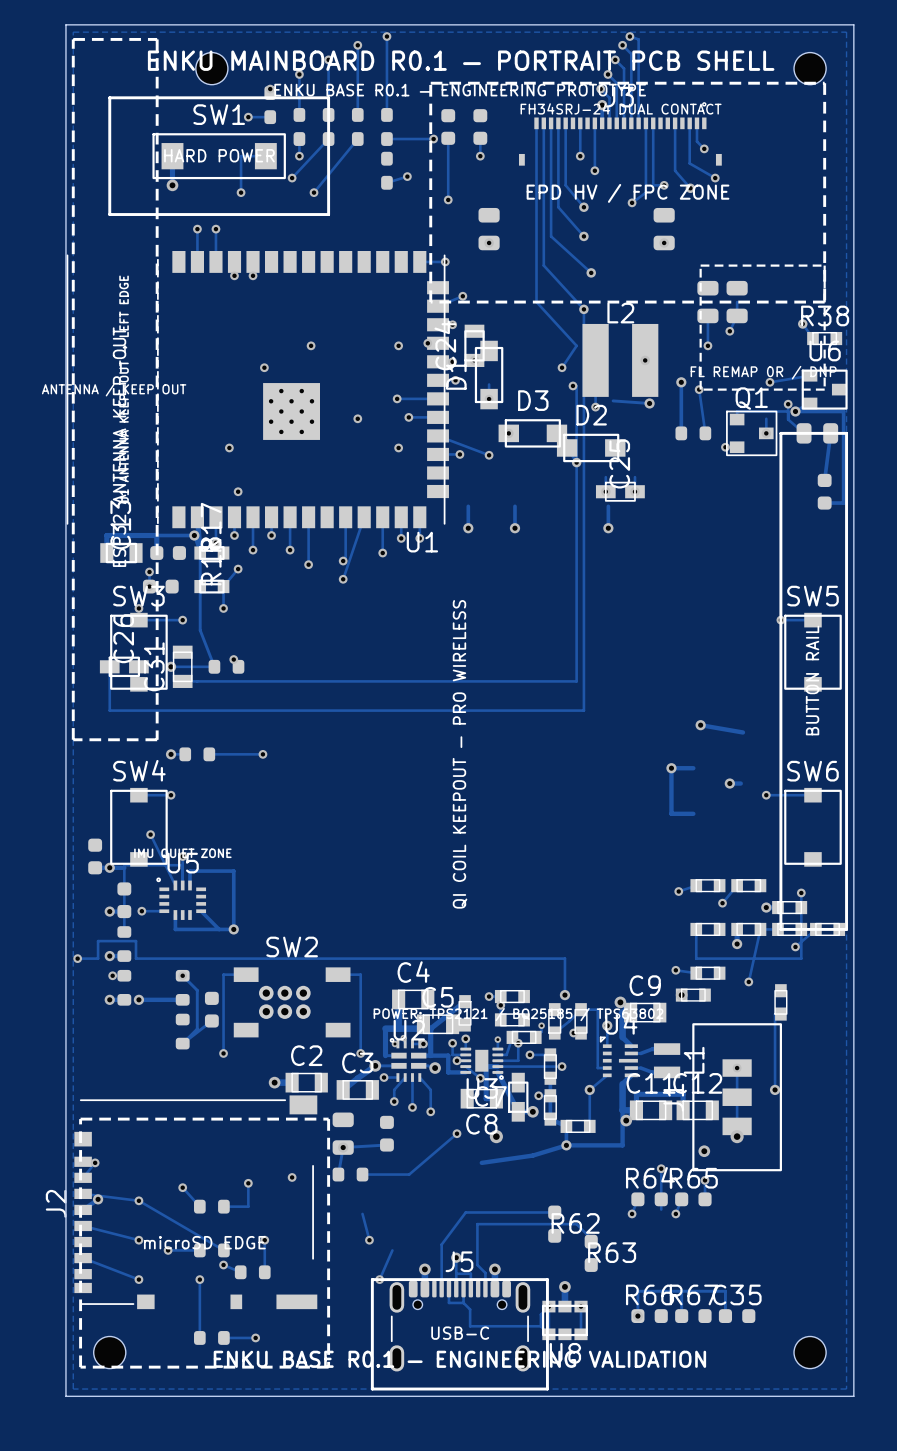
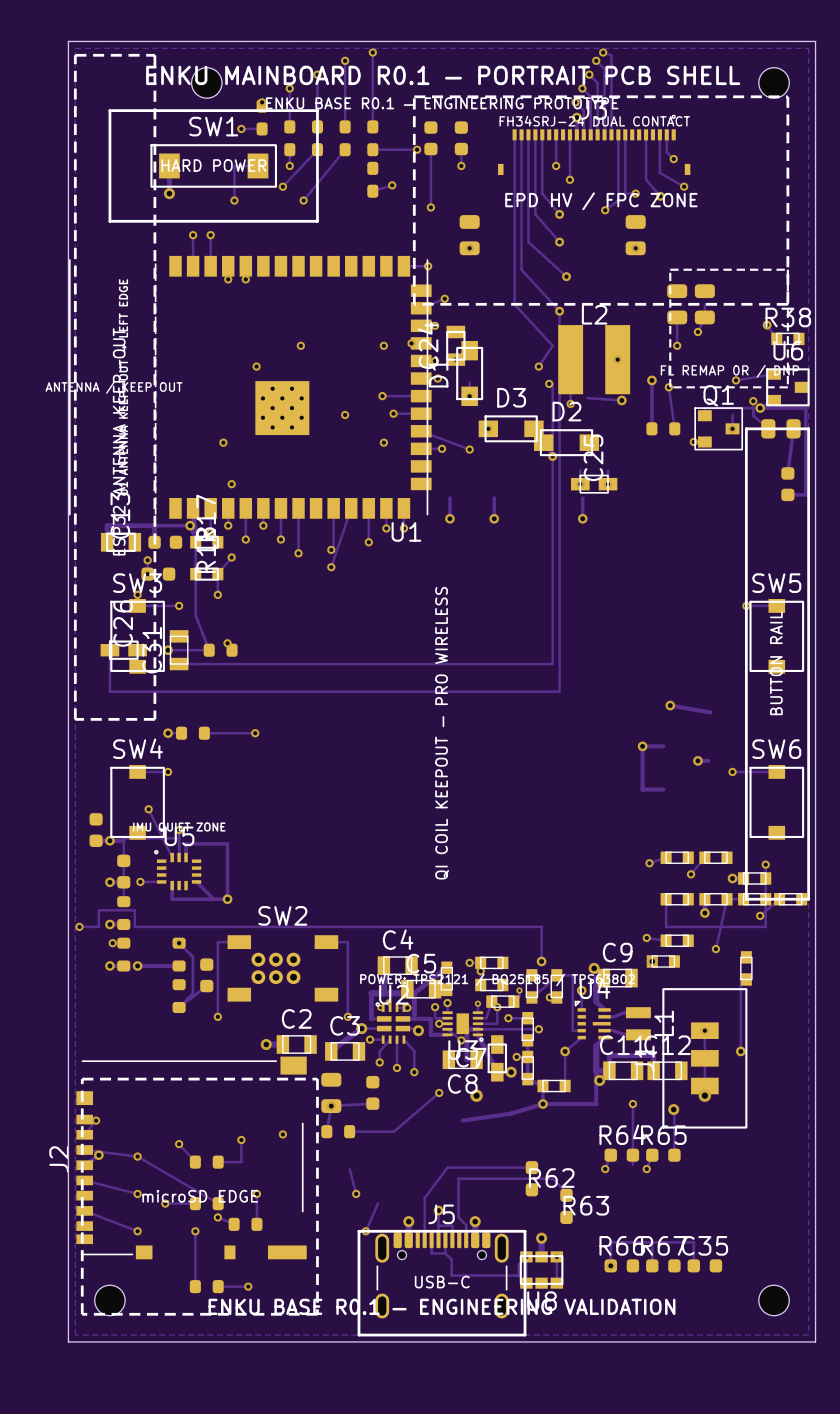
track: none -> (632, 1104) (632, 1126)
via: none -> (632, 1104)
track: none -> (674, 1109) (674, 1137)
via: (661, 1168) -> none
via: (705, 1180) -> none

